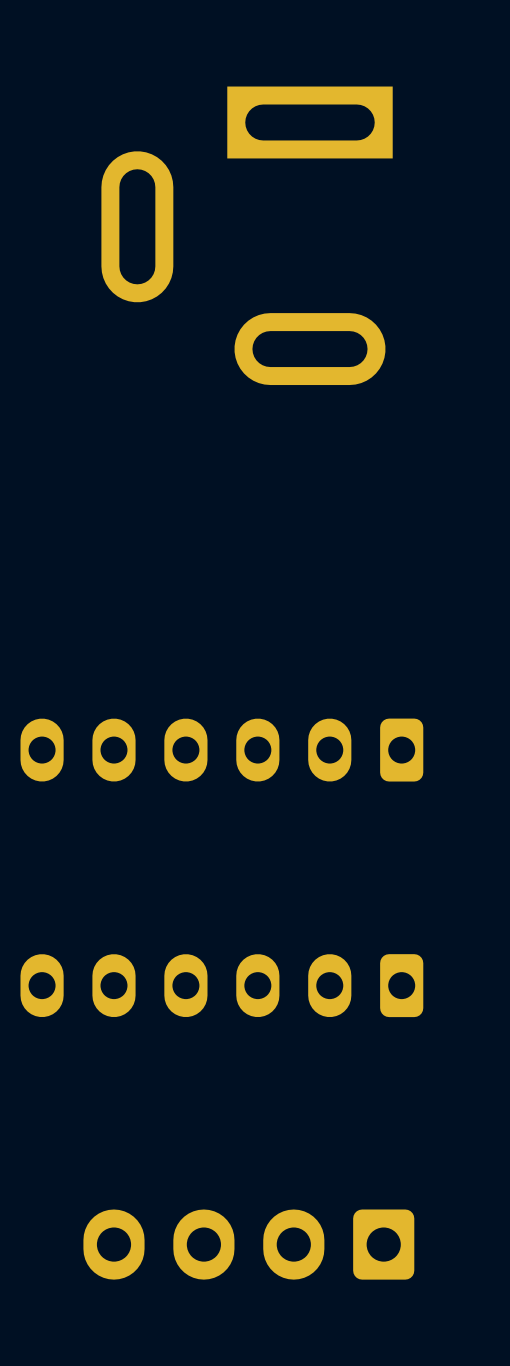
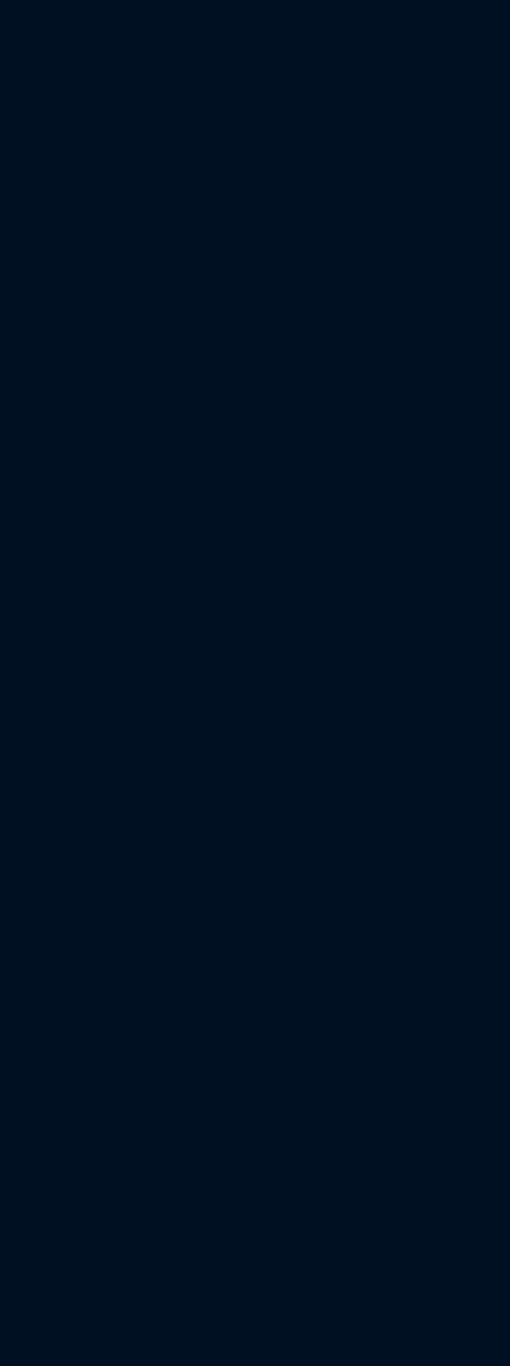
part: (247, 235) -> none
part: (221, 750) -> none
part: (221, 985) -> none
part: (248, 1244) -> none

